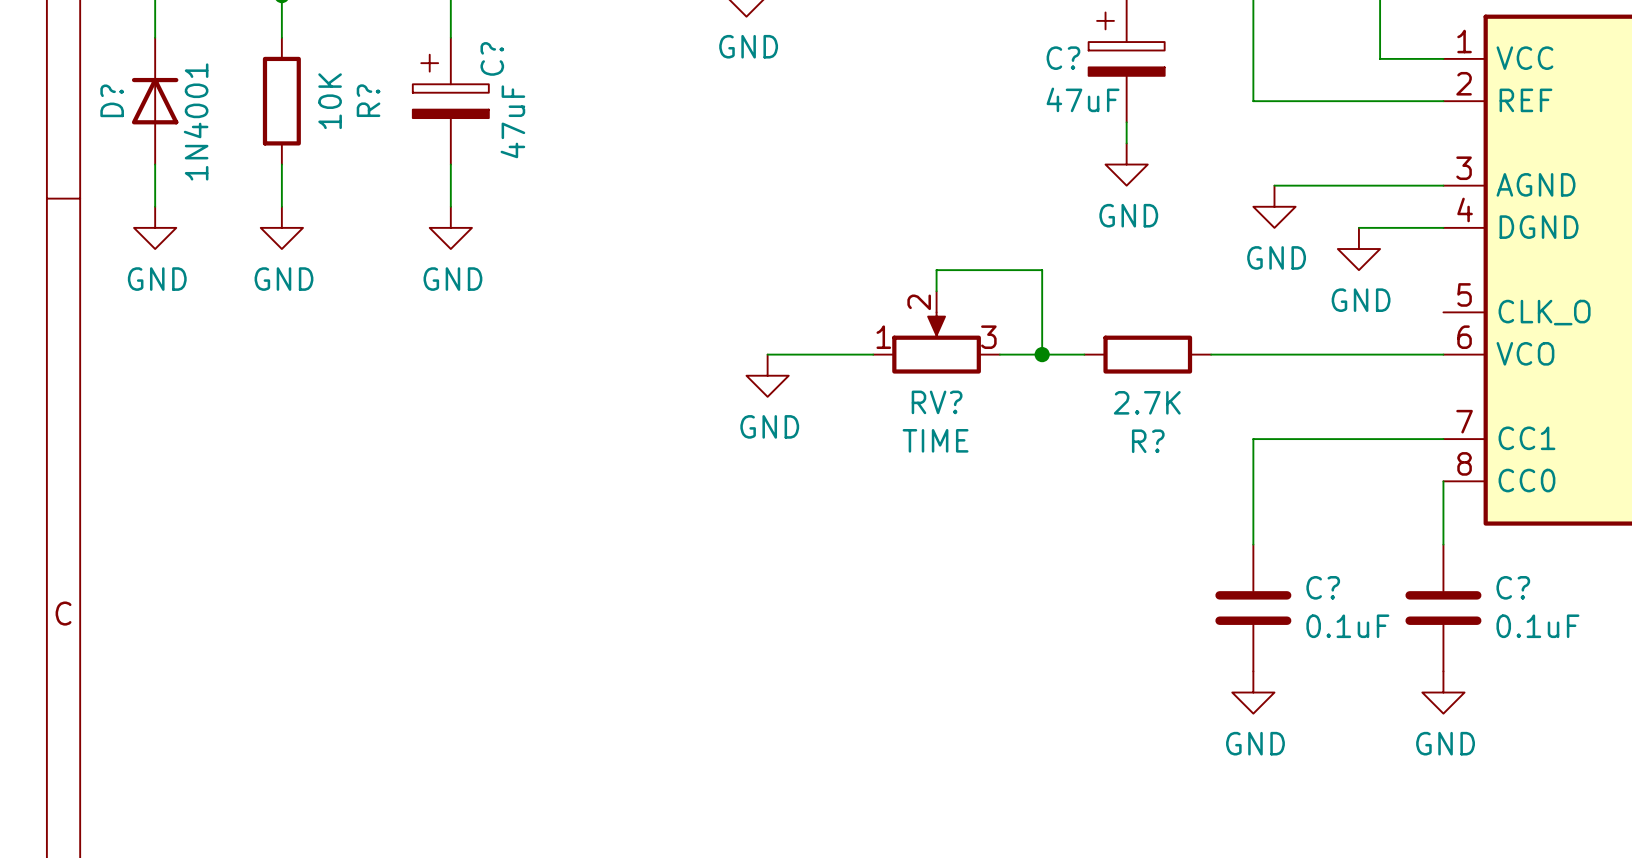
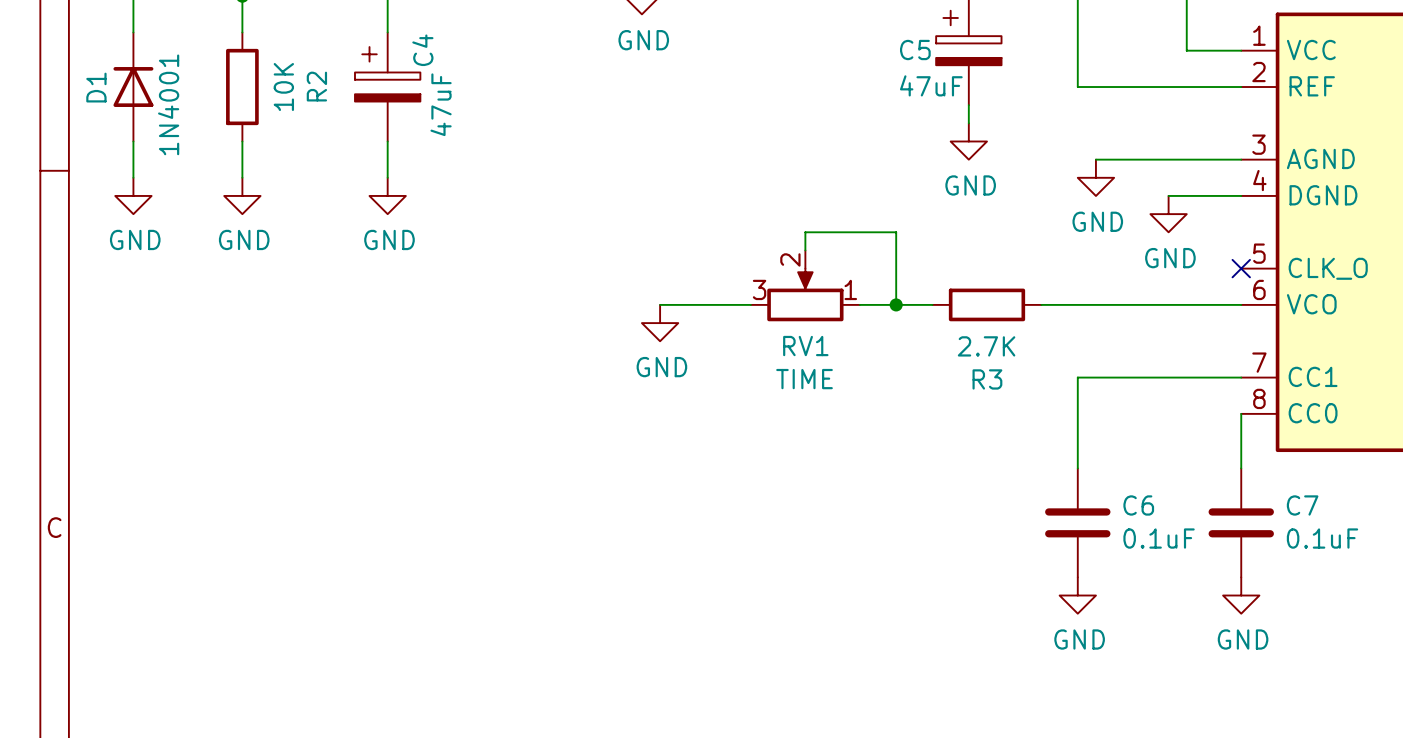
C? name: C? (492, 58) -> C4 (422, 50)
C? name: C? (1063, 58) -> C5 (915, 50)
D? name: D? (112, 100) -> D1 (96, 87)
R? name: R? (368, 100) -> R2 (316, 86)
no-connect mark: none -> (1241, 268)
RV? flip: as is (936, 342) -> left-right (805, 294)
RV? name: RV? (937, 402) -> RV1 (805, 346)
R? name: R? (1148, 441) -> R3 (987, 379)
C? name: C? (1323, 587) -> C6 (1138, 505)
C? name: C? (1513, 587) -> C7 (1302, 505)

